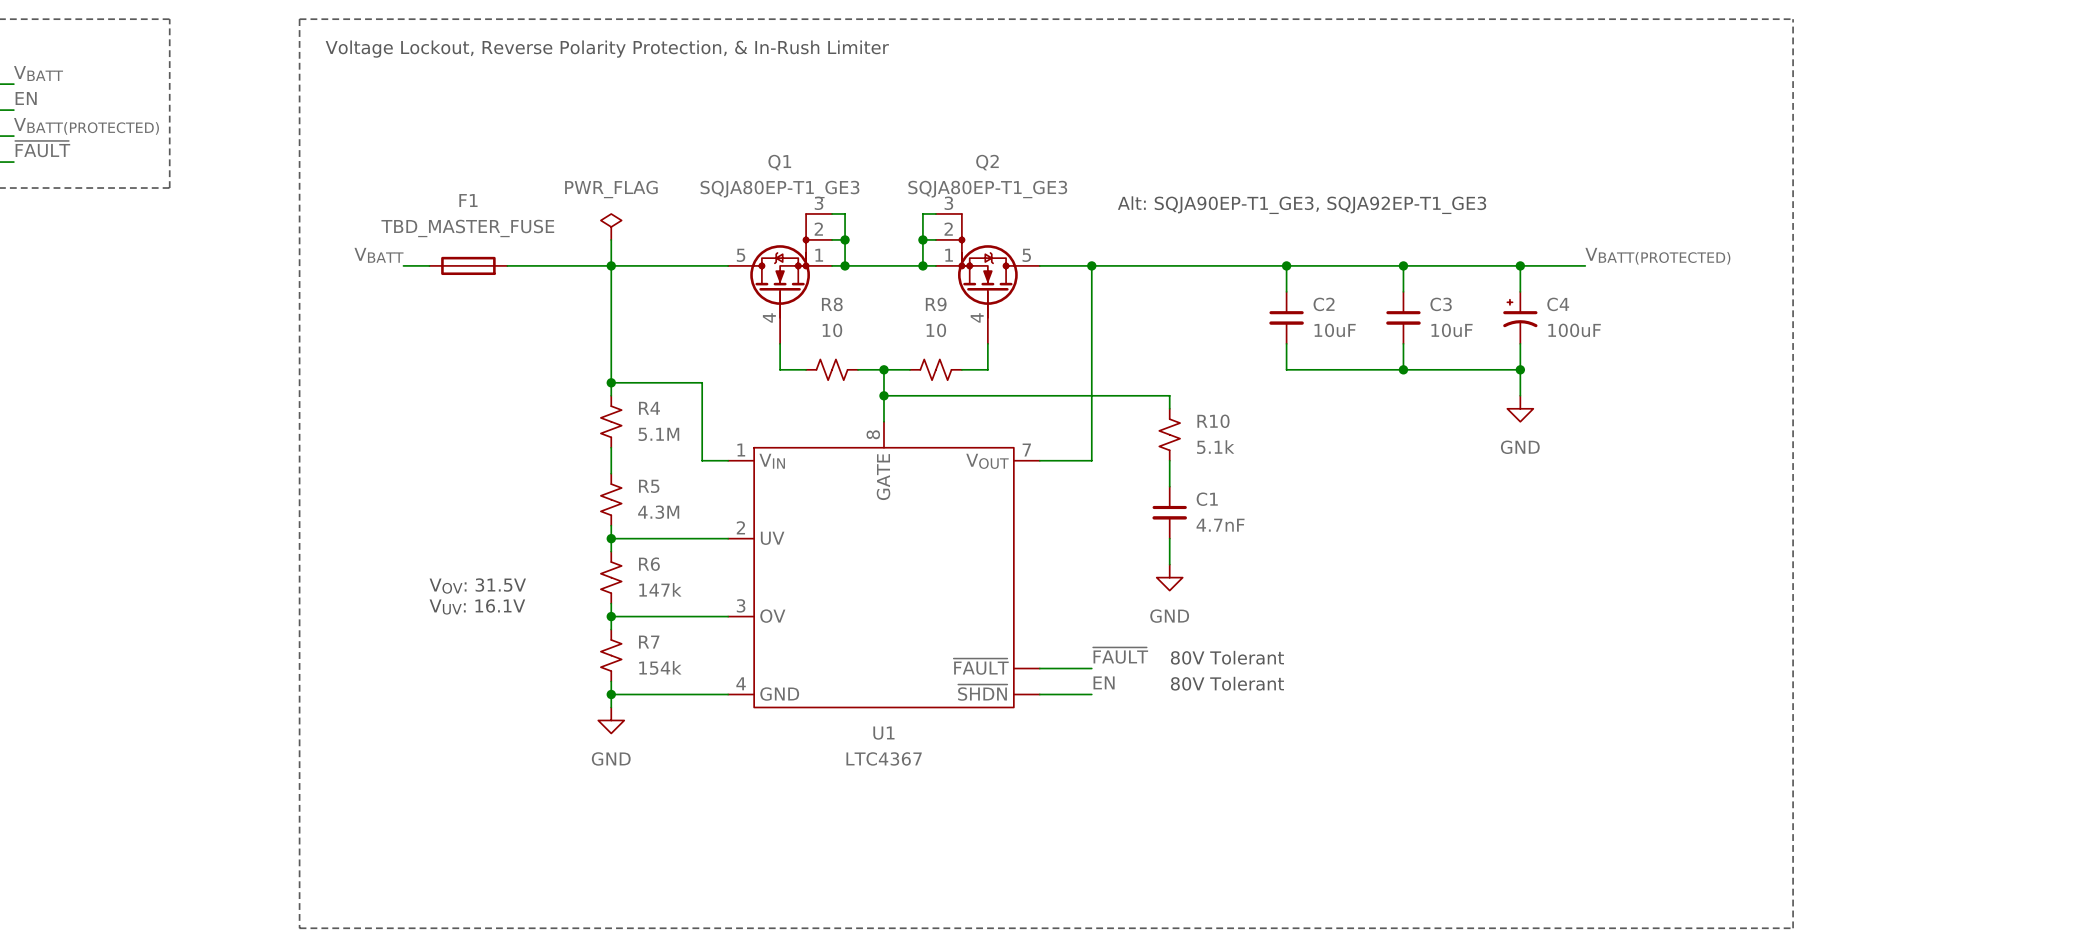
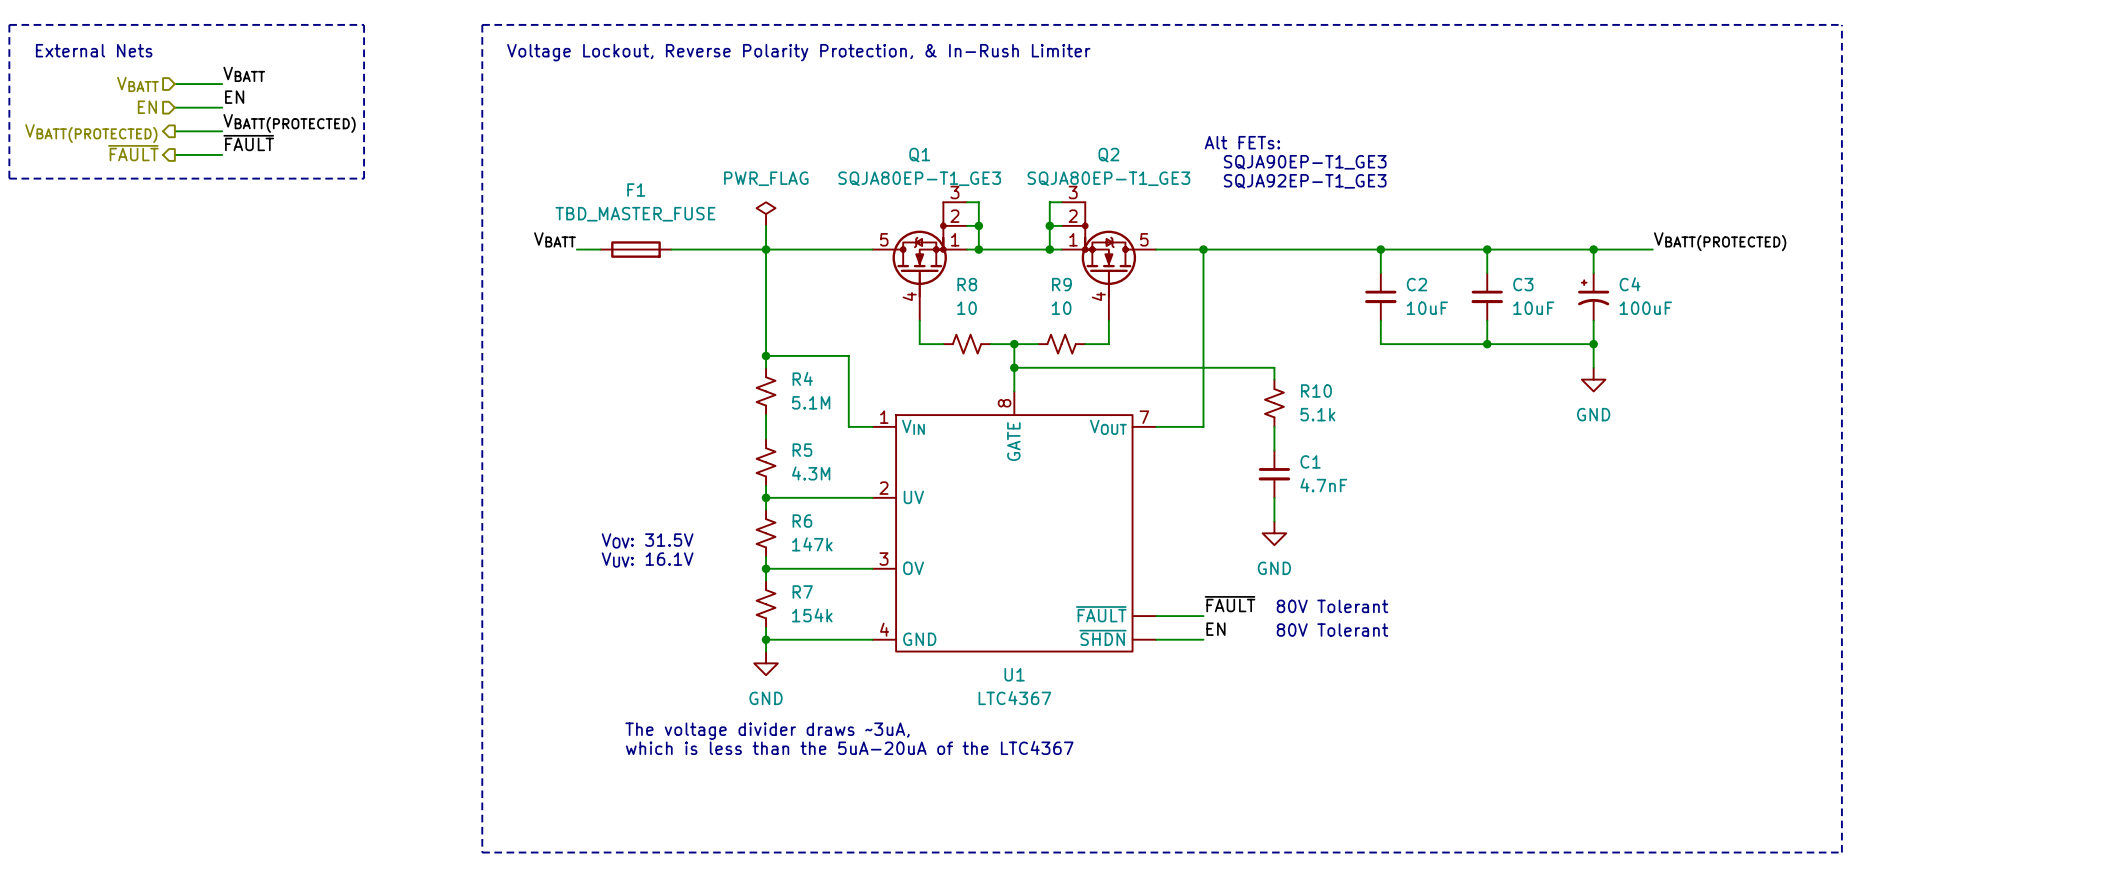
text: none -> Alt FETs: (1242, 142)
text: none -> SQJA90EP-T1_GE3 (1305, 162)
text: Alt: SQJA90EP-T1_GE3, SQJA92EP-T1_GE3 (1302, 205) -> SQJA92EP-T1_GE3 (1305, 181)
text: none -> The voltage divider draws ~3uA, (767, 731)
text: none -> which is less than the 5uA-20uA of the LTC4367 (849, 747)

